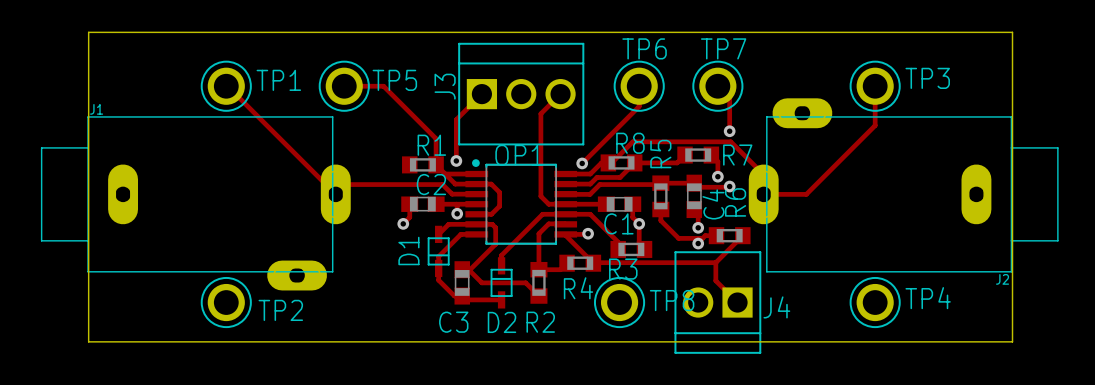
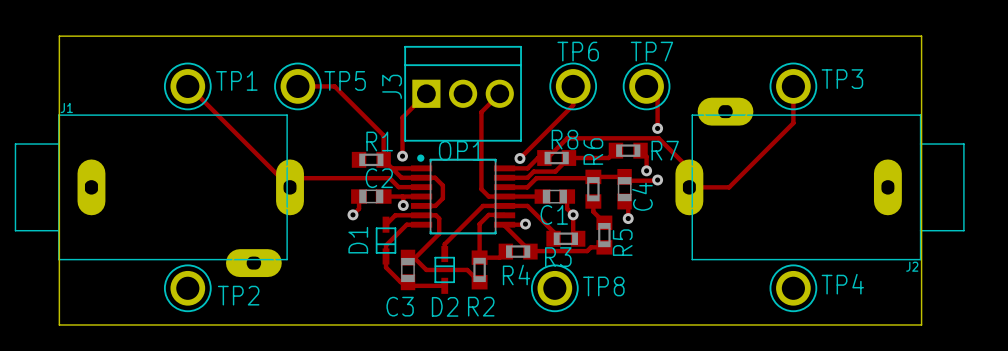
R5 name: R5 (660, 154) -> R6 (593, 151)
track: (672, 232) (678, 238) (702, 238) (705, 235) (716, 235) -> none
R6: (729, 235) -> none
track: (742, 235) (715, 262) -> none
via: (698, 243) -> none
R5: none -> (604, 235)
track: (654, 262) (715, 262) -> (587, 251) (590, 247) (604, 247)
track: (715, 262) (715, 280) (737, 302) -> none
J4: (717, 302) -> none

